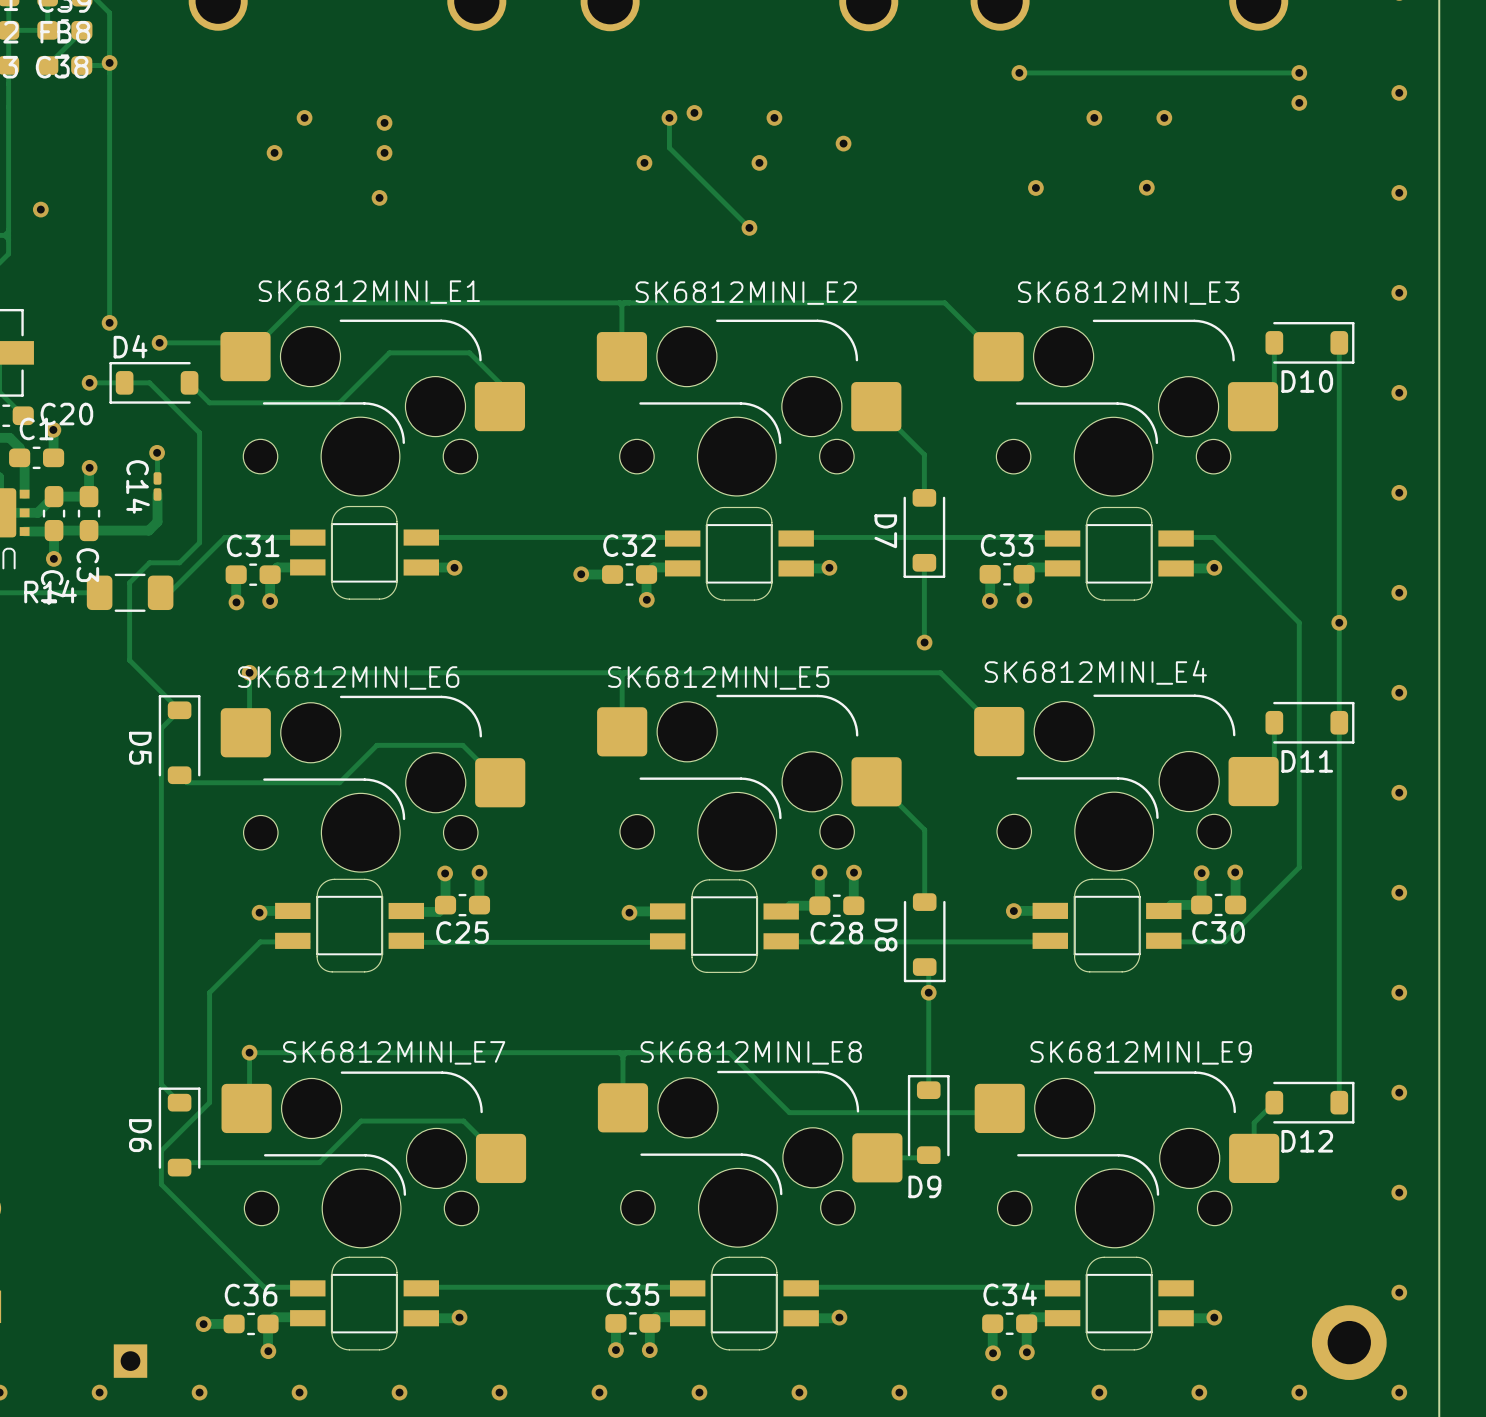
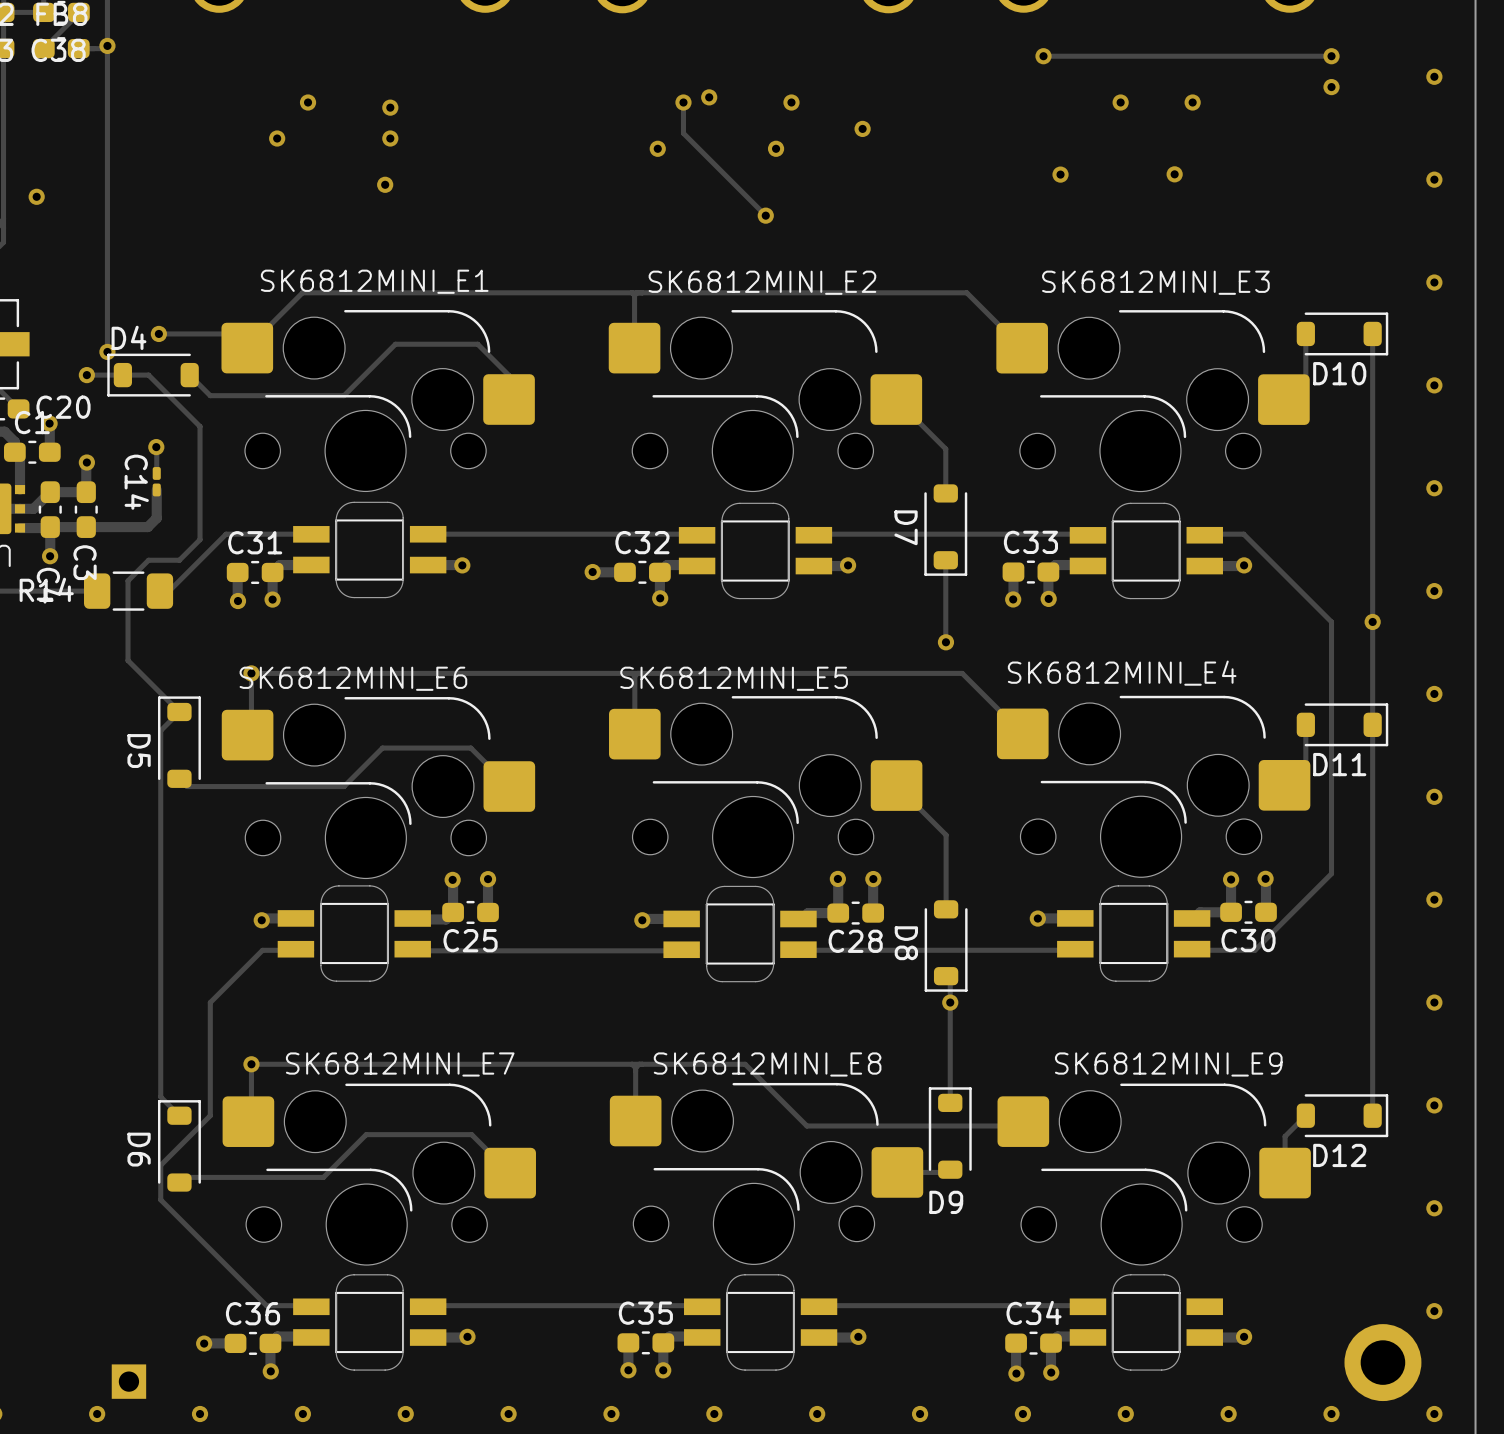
track: none -> (107, 313) (107, 351)
via position: (109, 322) -> (107, 351)

